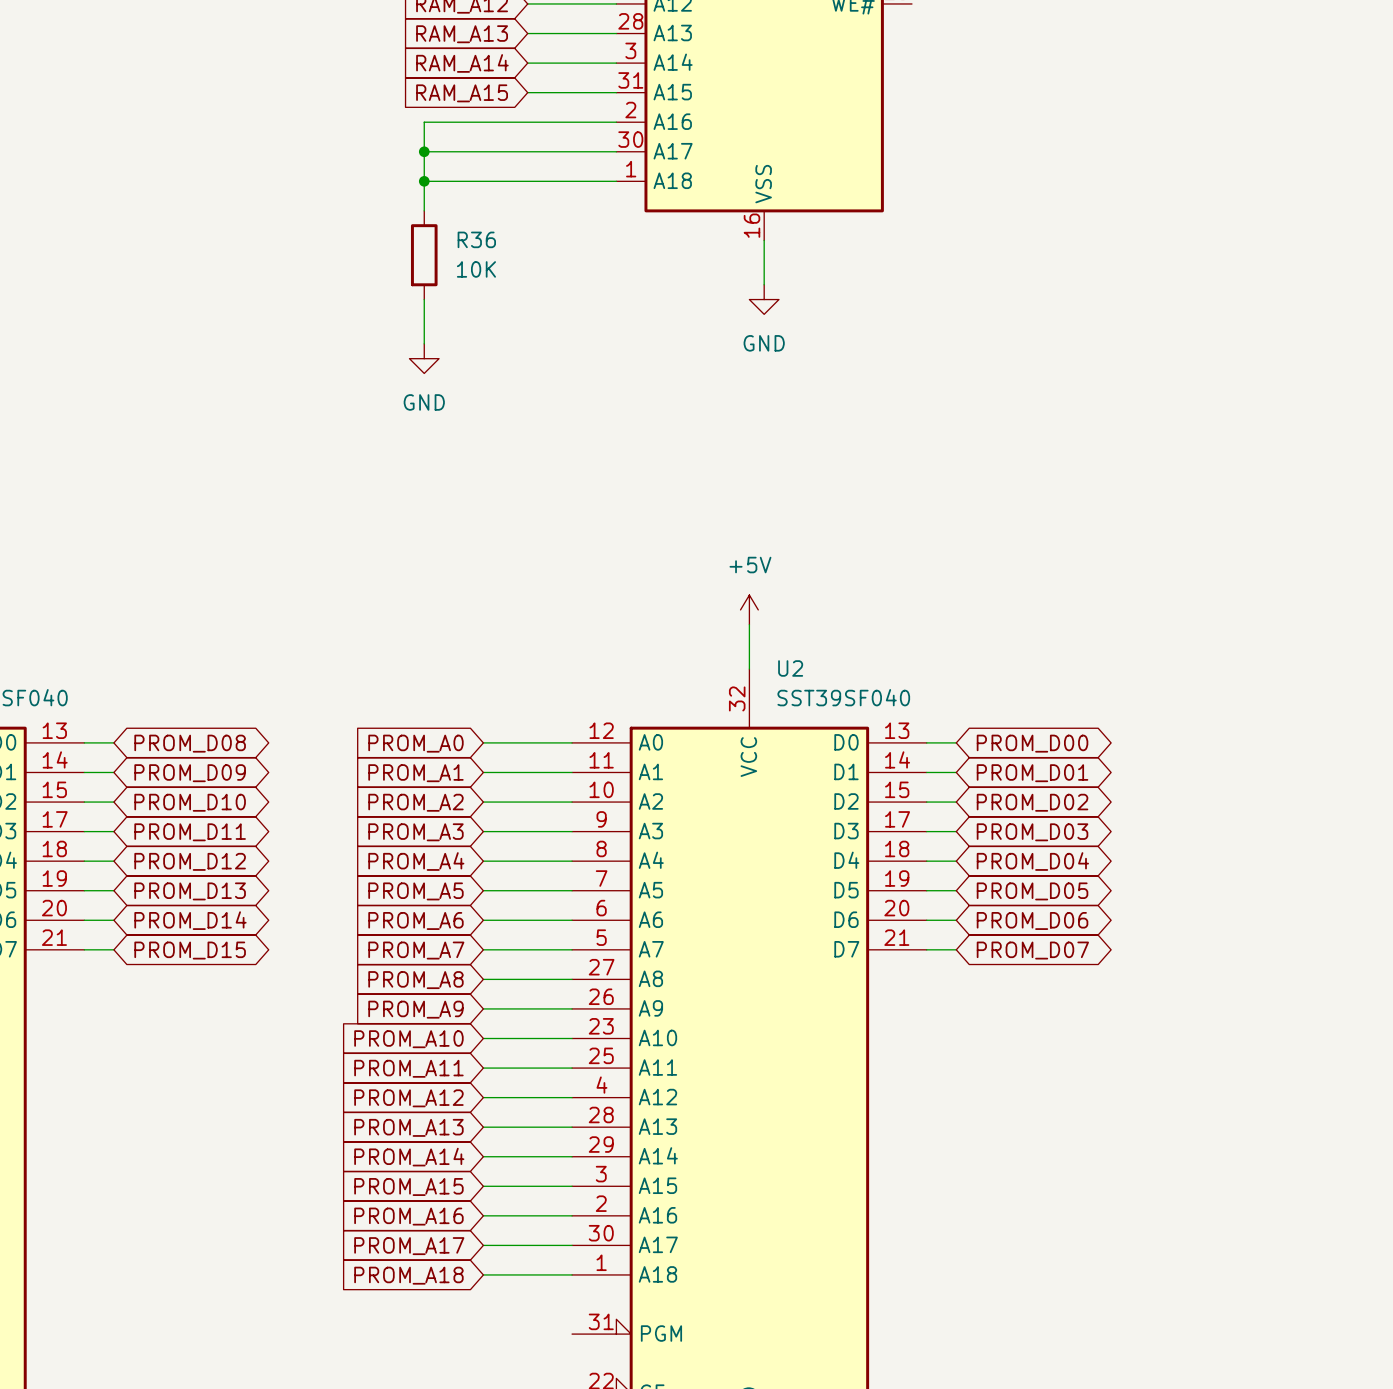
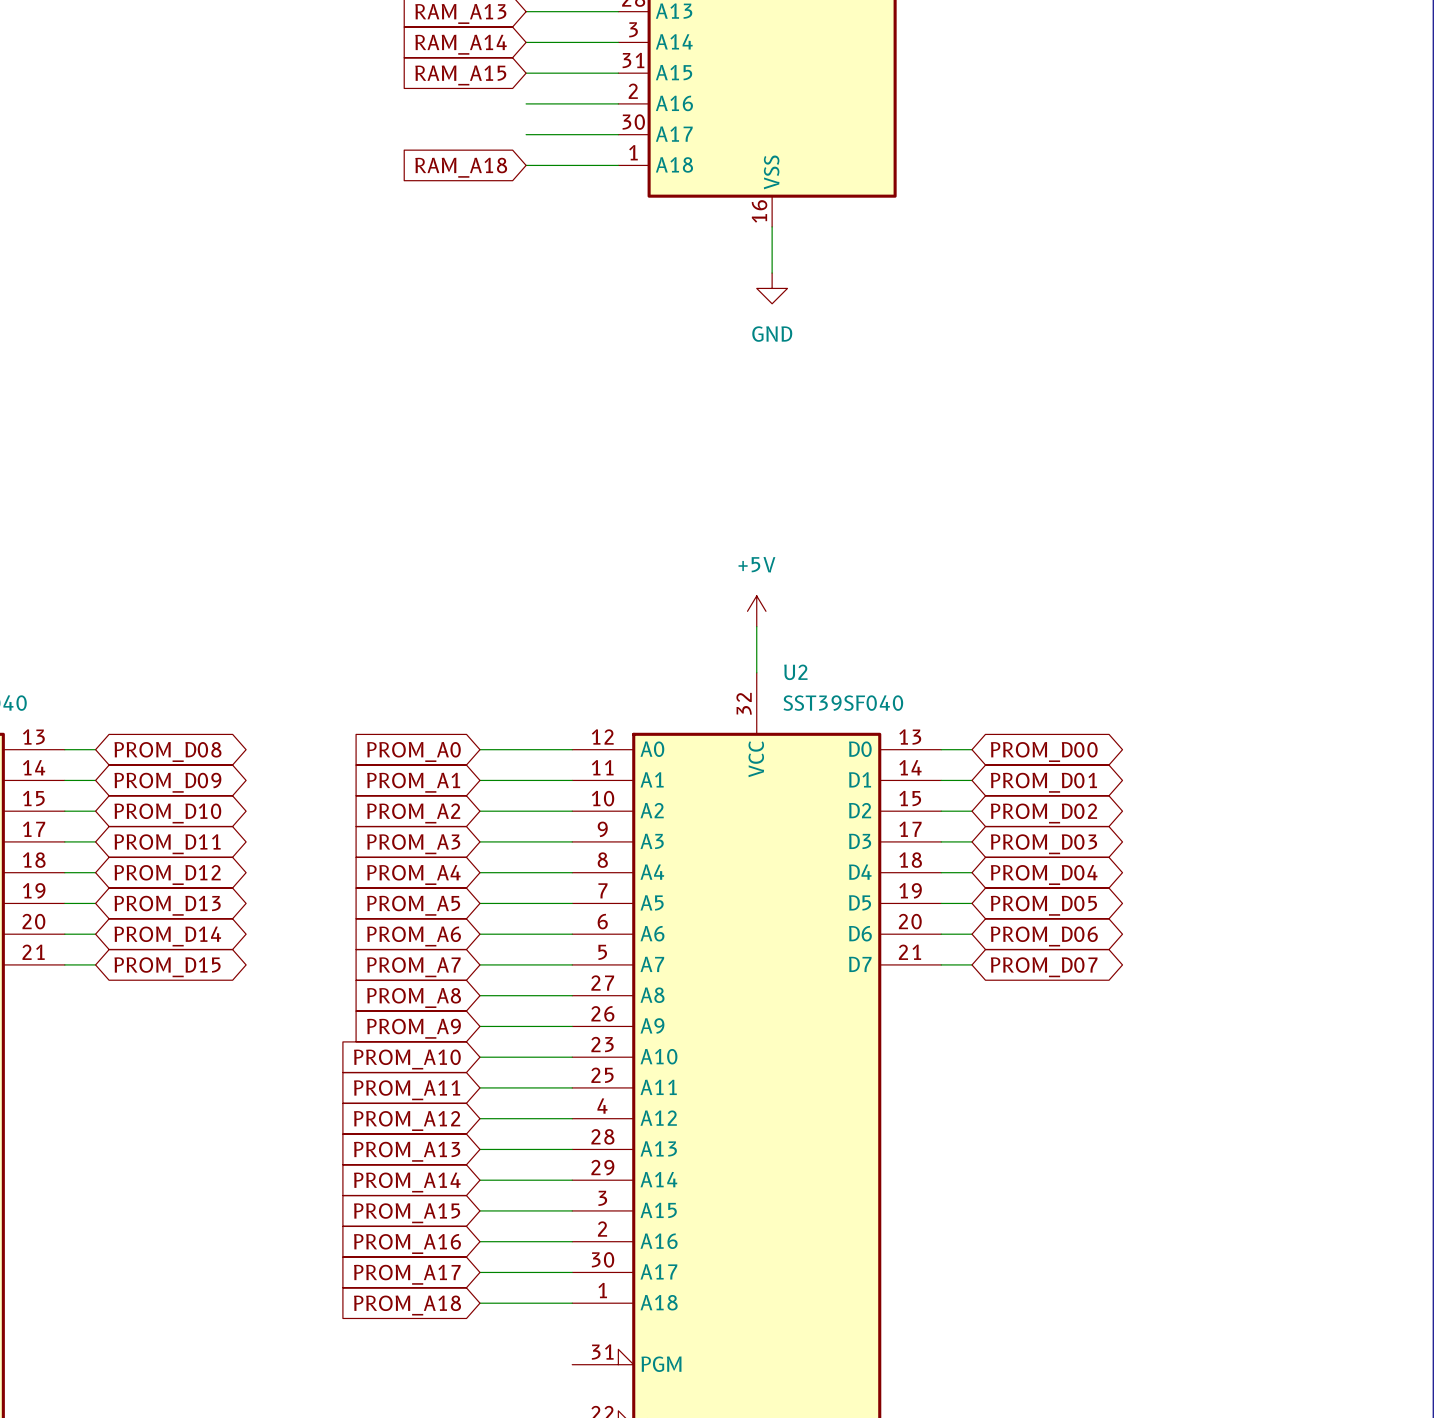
wire: (527, 122) (424, 122) (424, 210) -> none
wire: (424, 151) (527, 151) -> none
junction: (424, 151) -> none
wire: (424, 181) (527, 181) -> none
junction: (424, 181) -> none
global label: none -> RAM_A18 (461, 167)
R36: 10K (424, 255) -> none
wire: (424, 299) (424, 343) -> none
power symbol: GND (424, 358) -> none

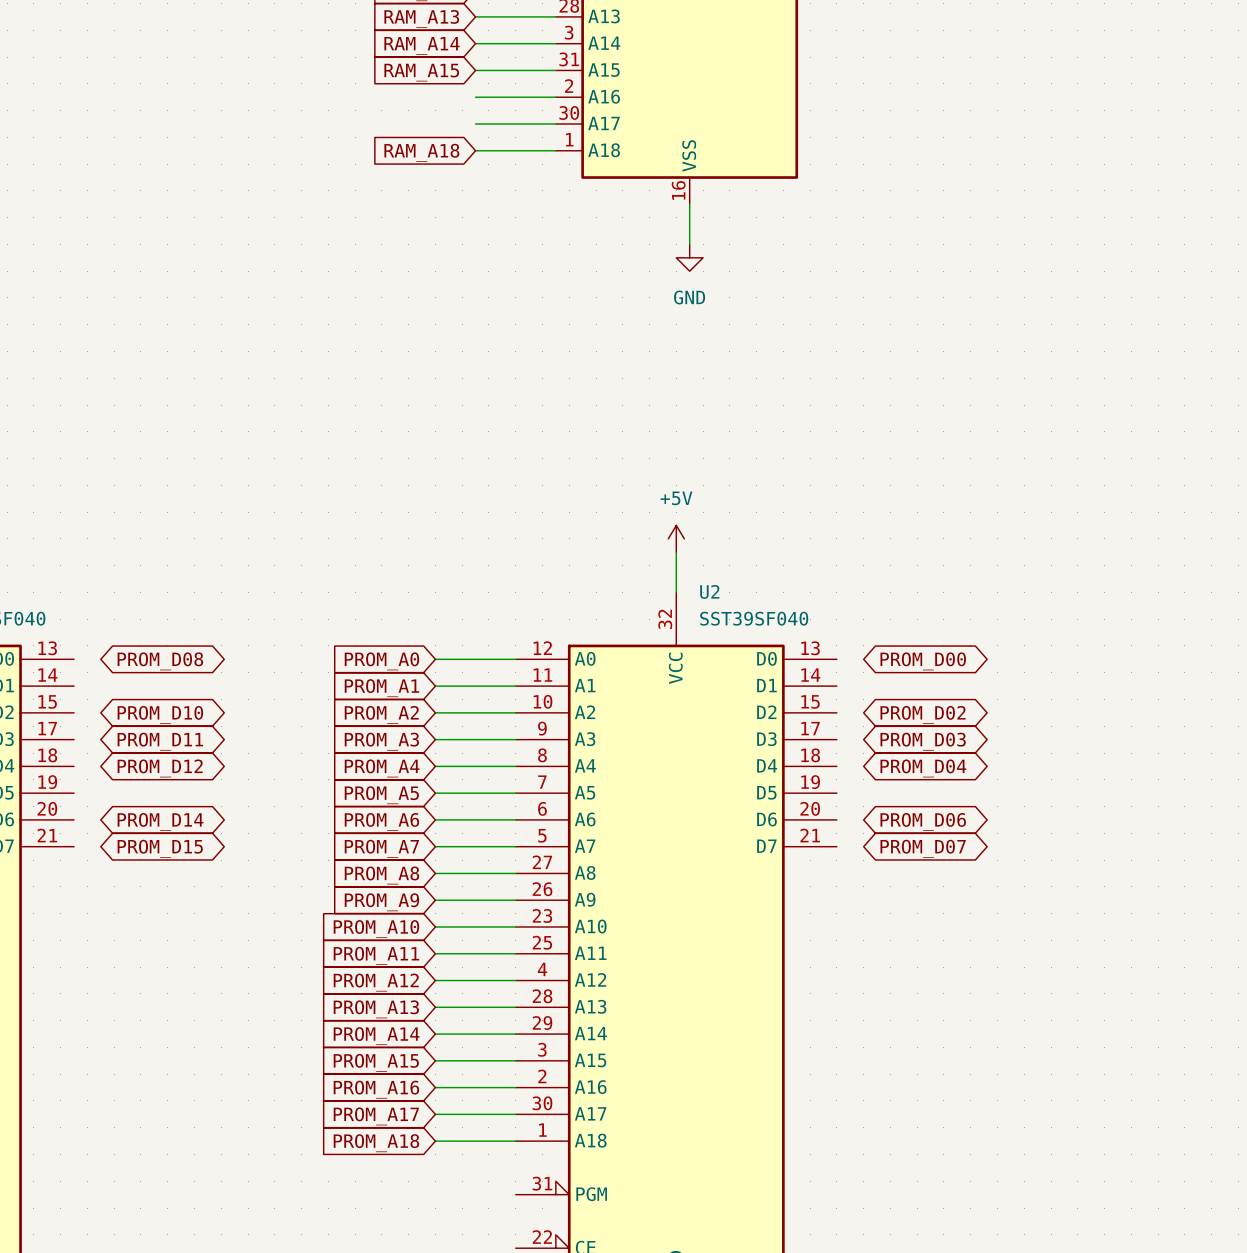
wire: (64, 749) (95, 749) -> none
wire: (941, 749) (971, 749) -> none
wire: (64, 780) (95, 780) -> none
wire: (941, 780) (971, 780) -> none
global label: PROM_D09 (167, 782) -> none
global label: PROM_D01 (1043, 782) -> none
wire: (64, 811) (95, 811) -> none
wire: (941, 811) (971, 811) -> none
wire: (64, 841) (95, 841) -> none
wire: (941, 841) (971, 841) -> none
wire: (64, 872) (95, 872) -> none
wire: (941, 872) (971, 872) -> none
wire: (64, 903) (95, 903) -> none
wire: (941, 903) (971, 903) -> none
global label: PROM_D13 (167, 905) -> none
global label: PROM_D05 (1043, 905) -> none
wire: (64, 934) (95, 934) -> none
wire: (941, 934) (971, 934) -> none
wire: (64, 964) (95, 964) -> none
wire: (941, 964) (971, 964) -> none

